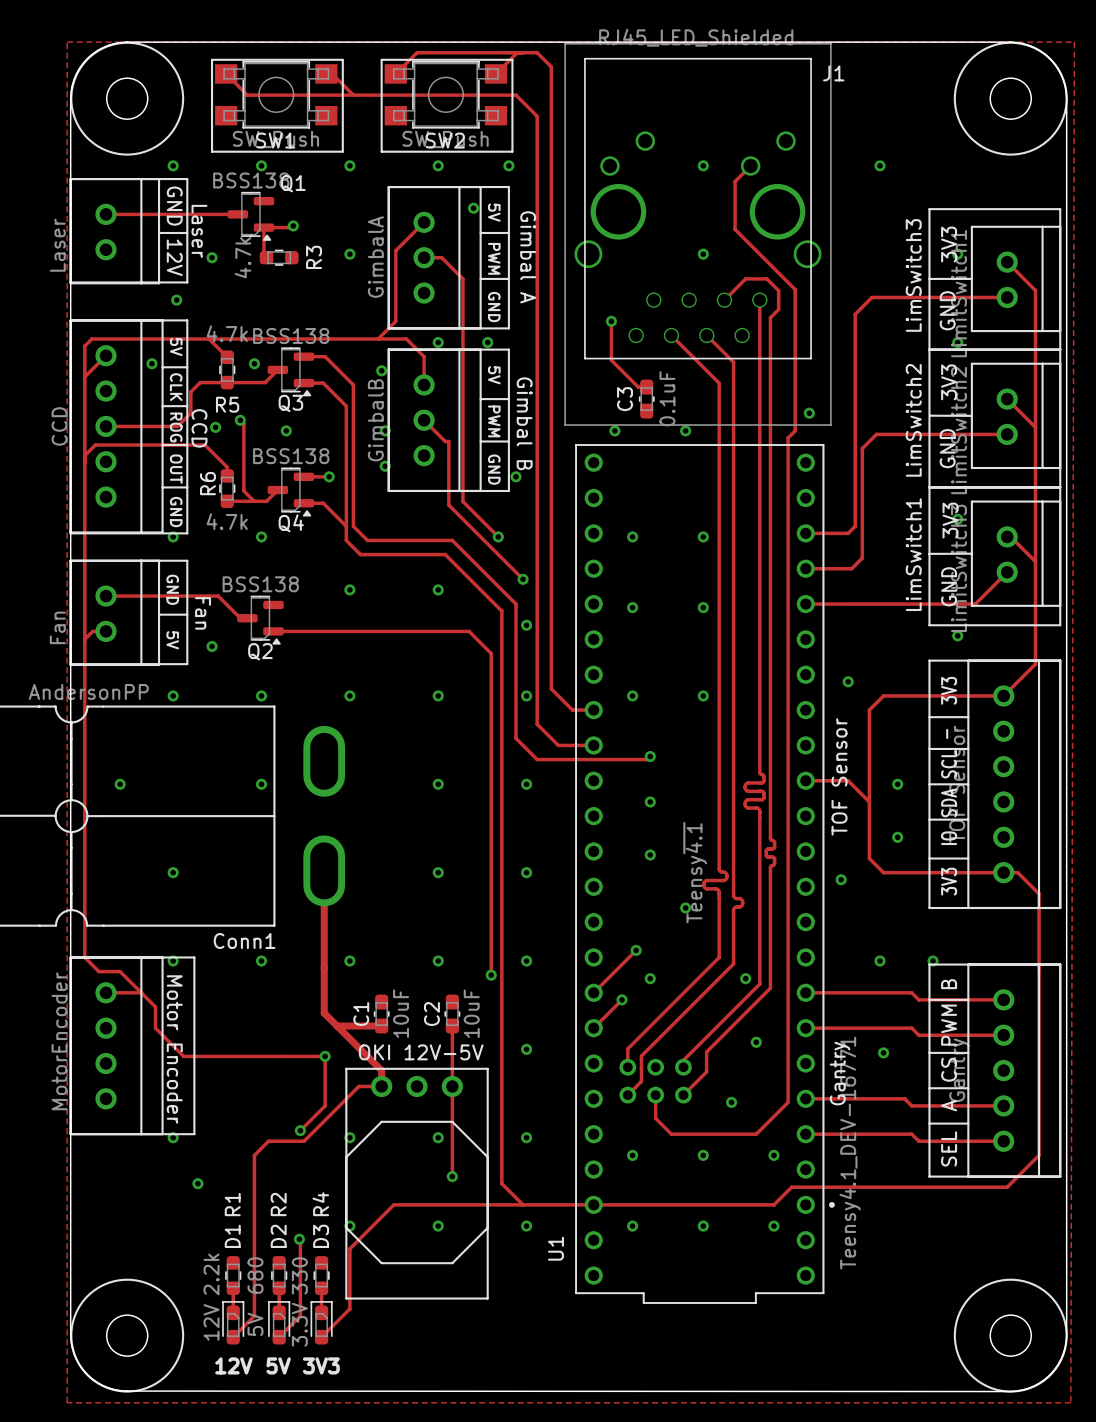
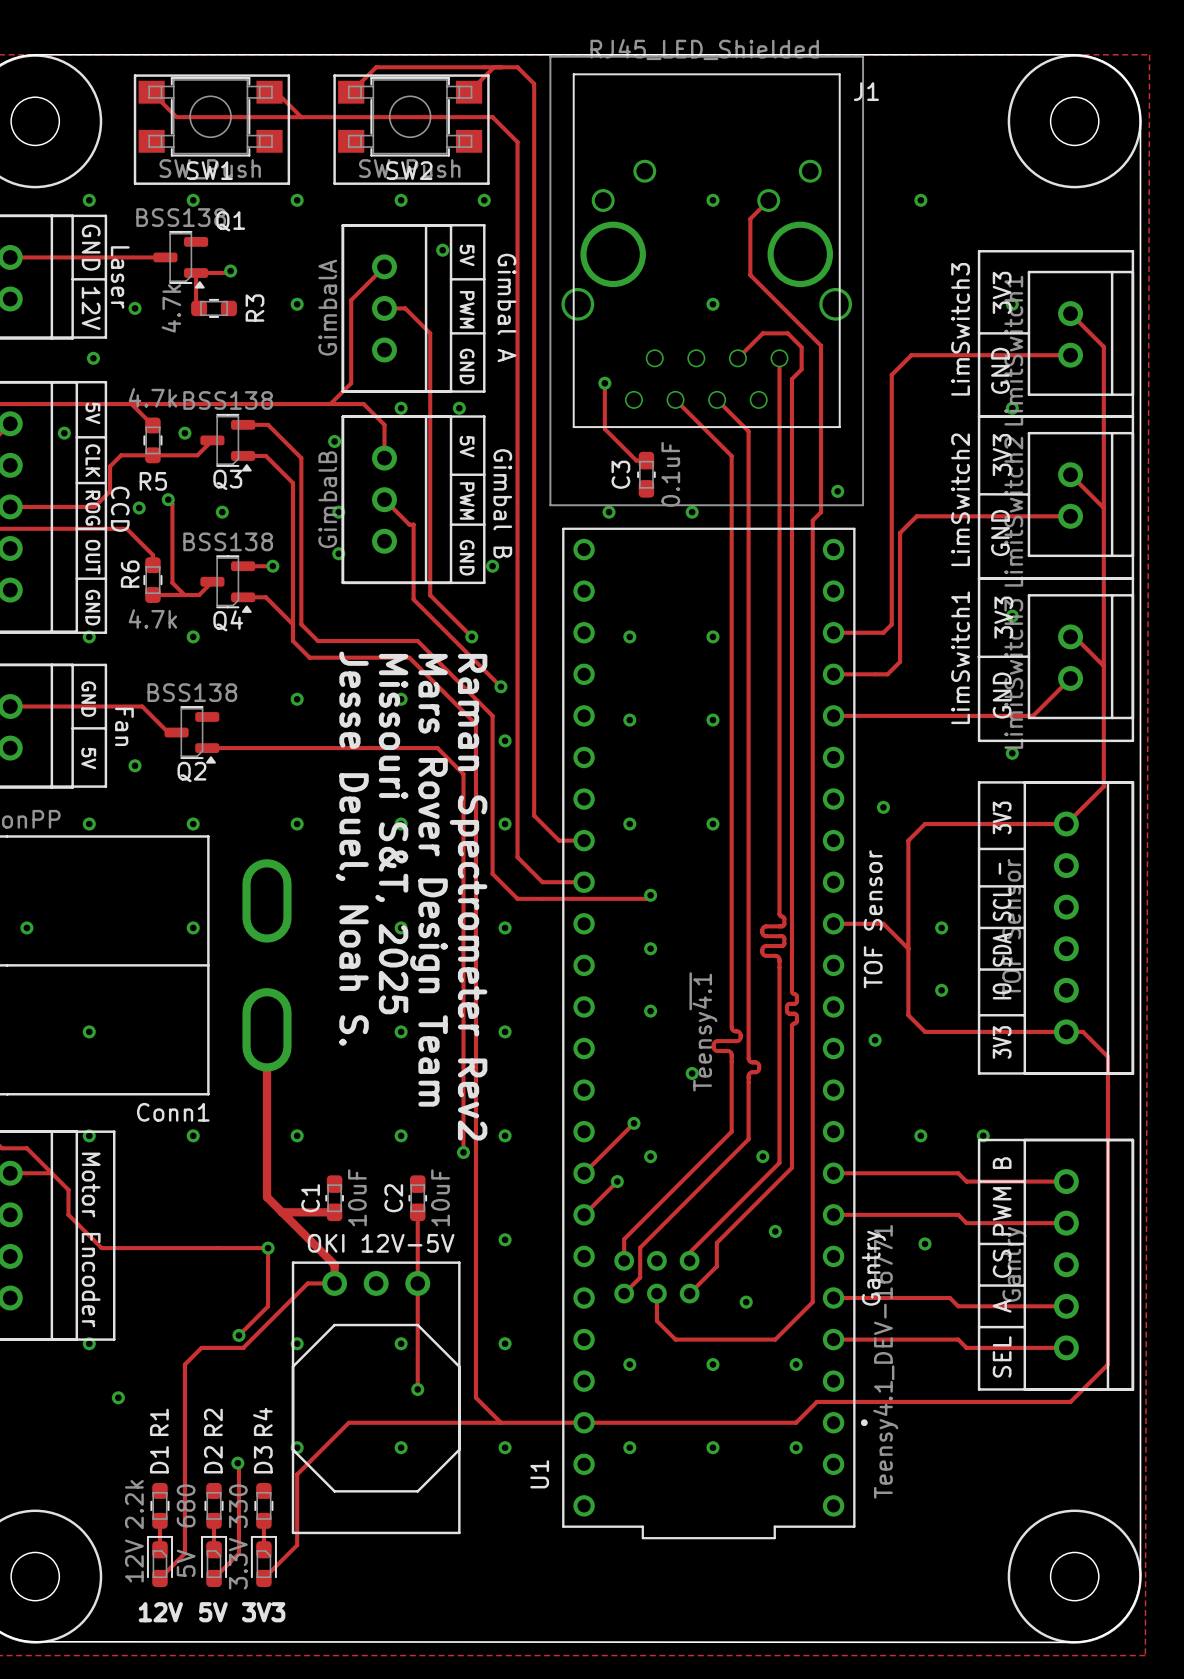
text: none -> Missouri S&T, 2025 (391, 834)
text: none -> Jesse Deuel, Noah S. (352, 848)
text: none -> Mars Rover Design Team (429, 880)
text: none -> Raman Spectrometer Rev2 (468, 897)

